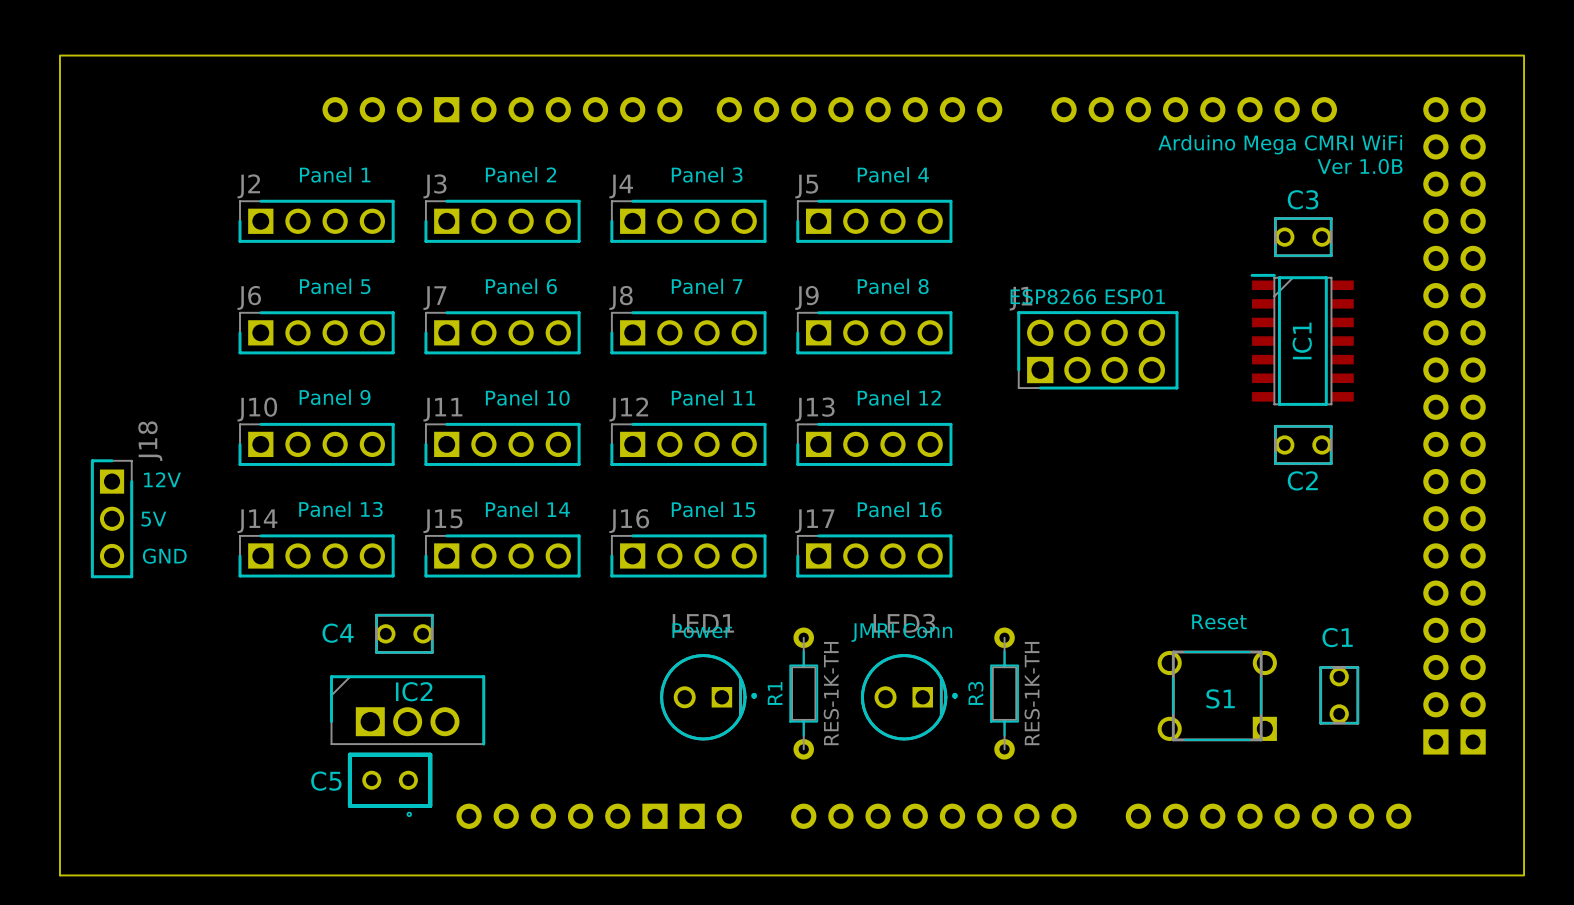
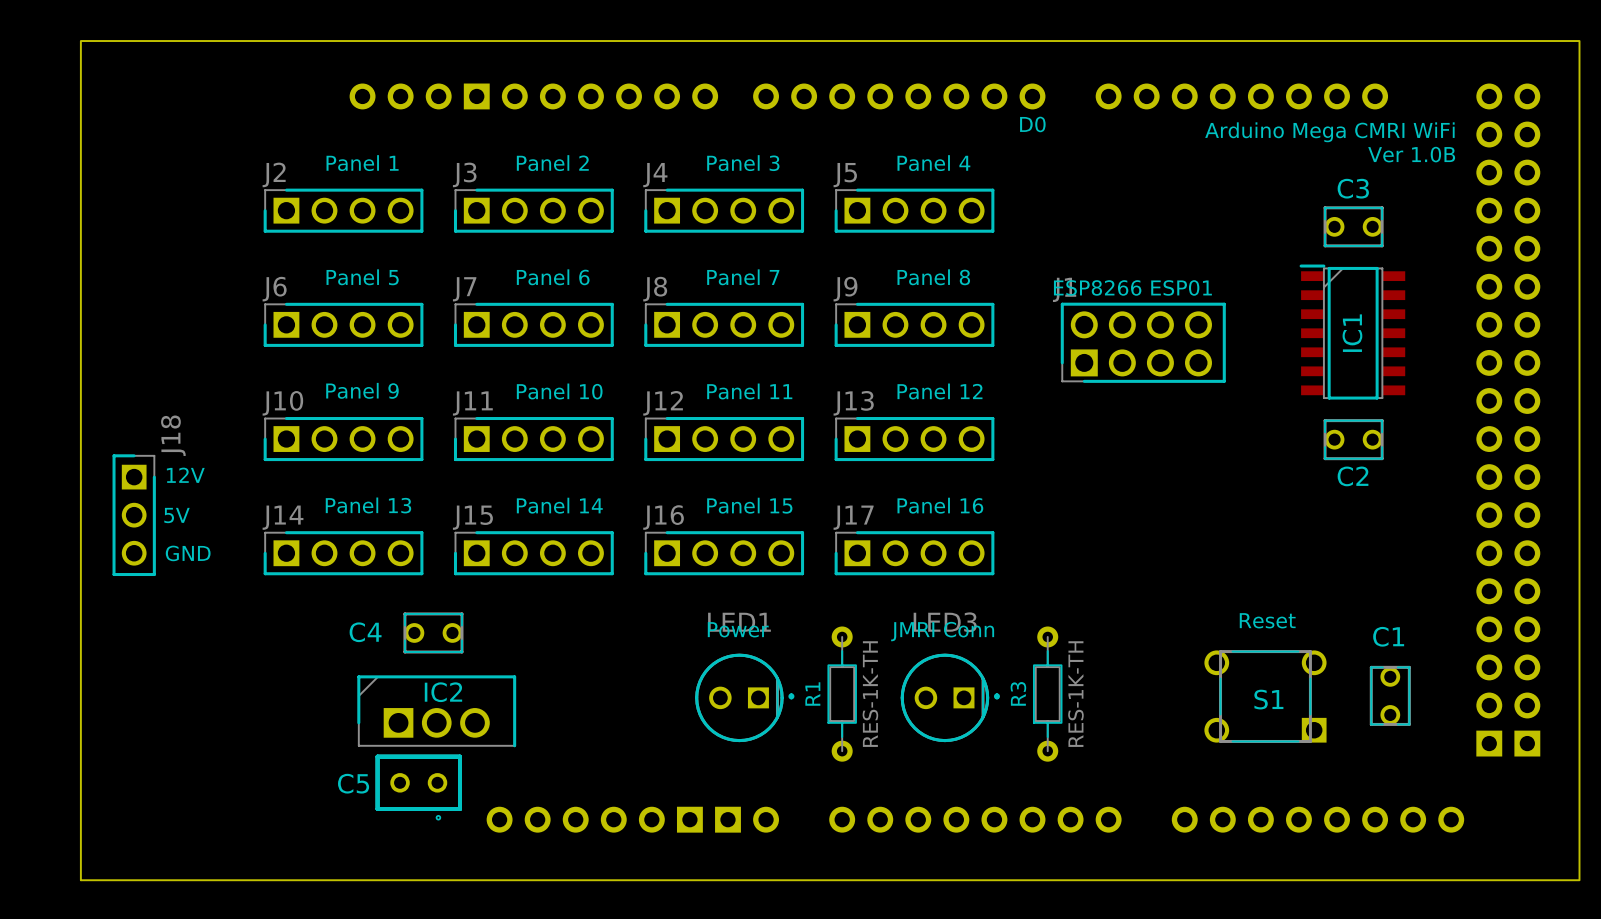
part text: none -> D0 (1032, 124)

